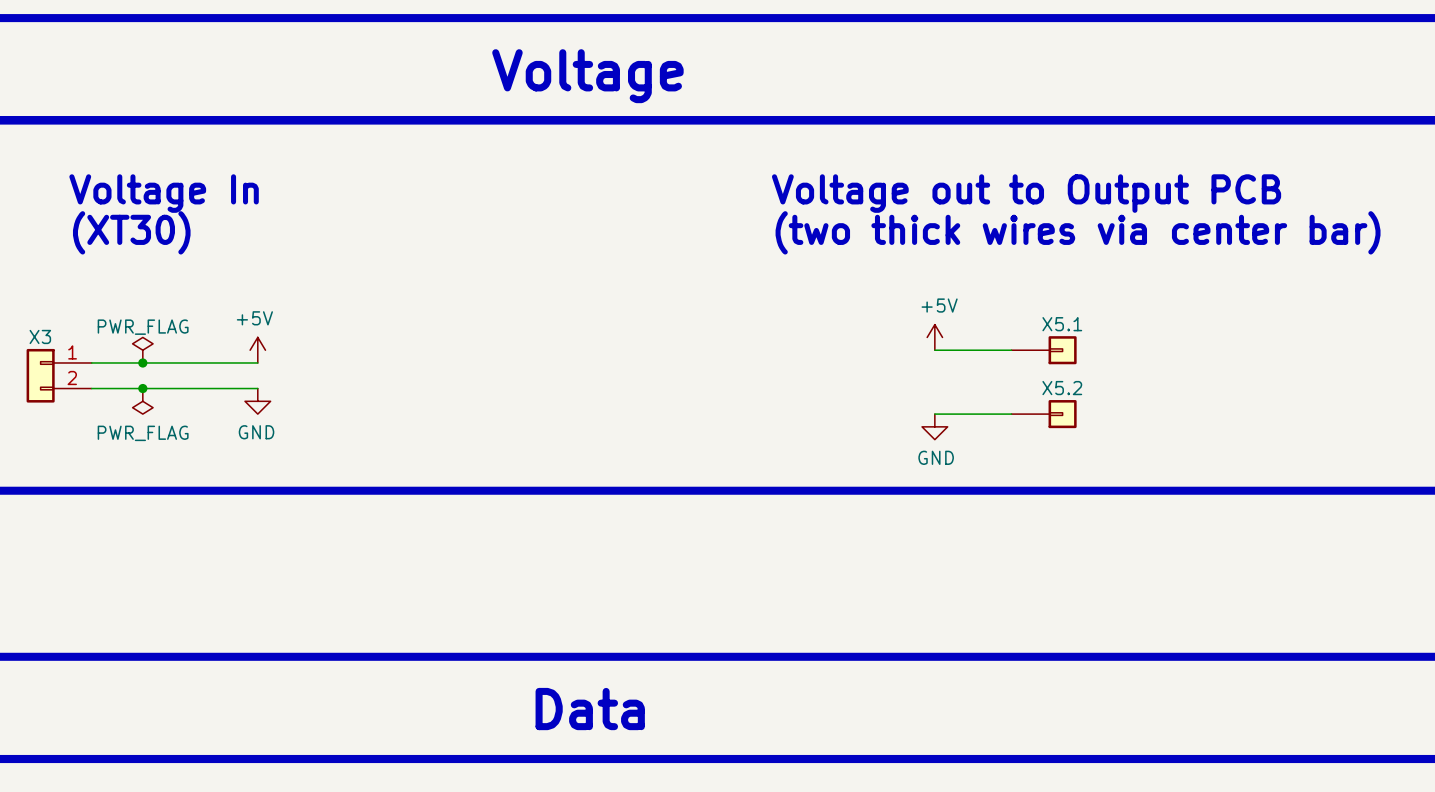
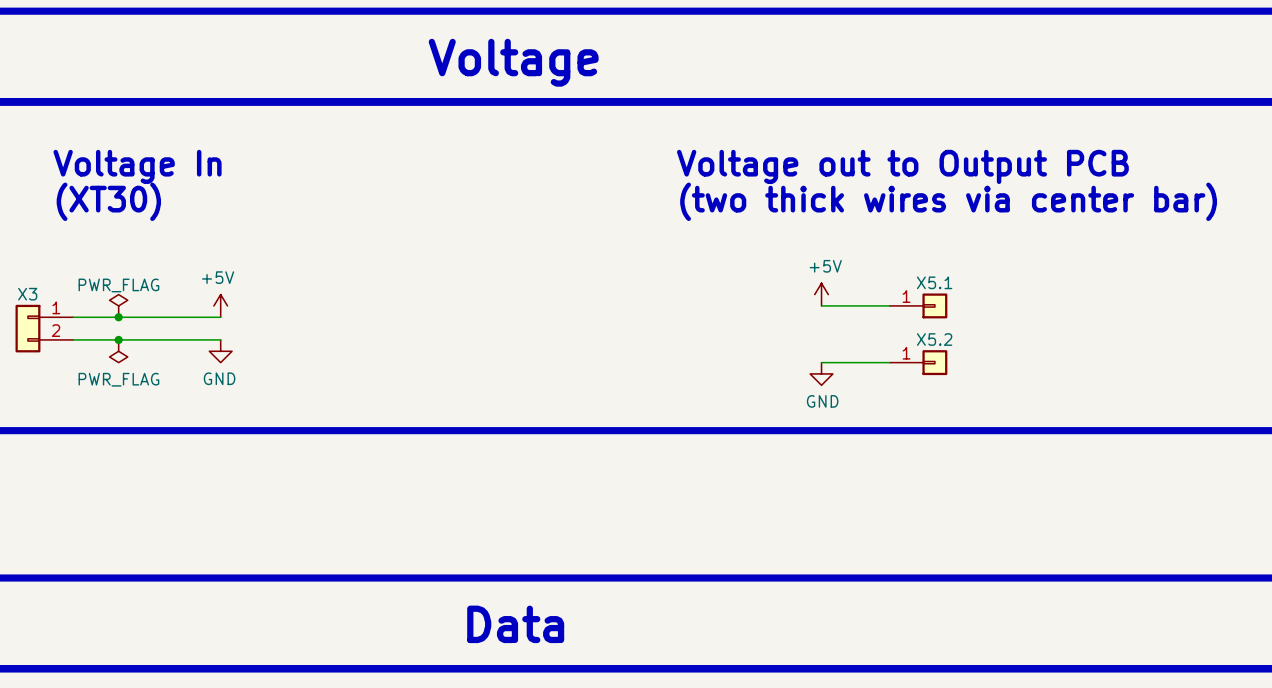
X5.1 pin number: none -> 1 (906, 296)
X5.2 pin number: none -> 1 (906, 353)

